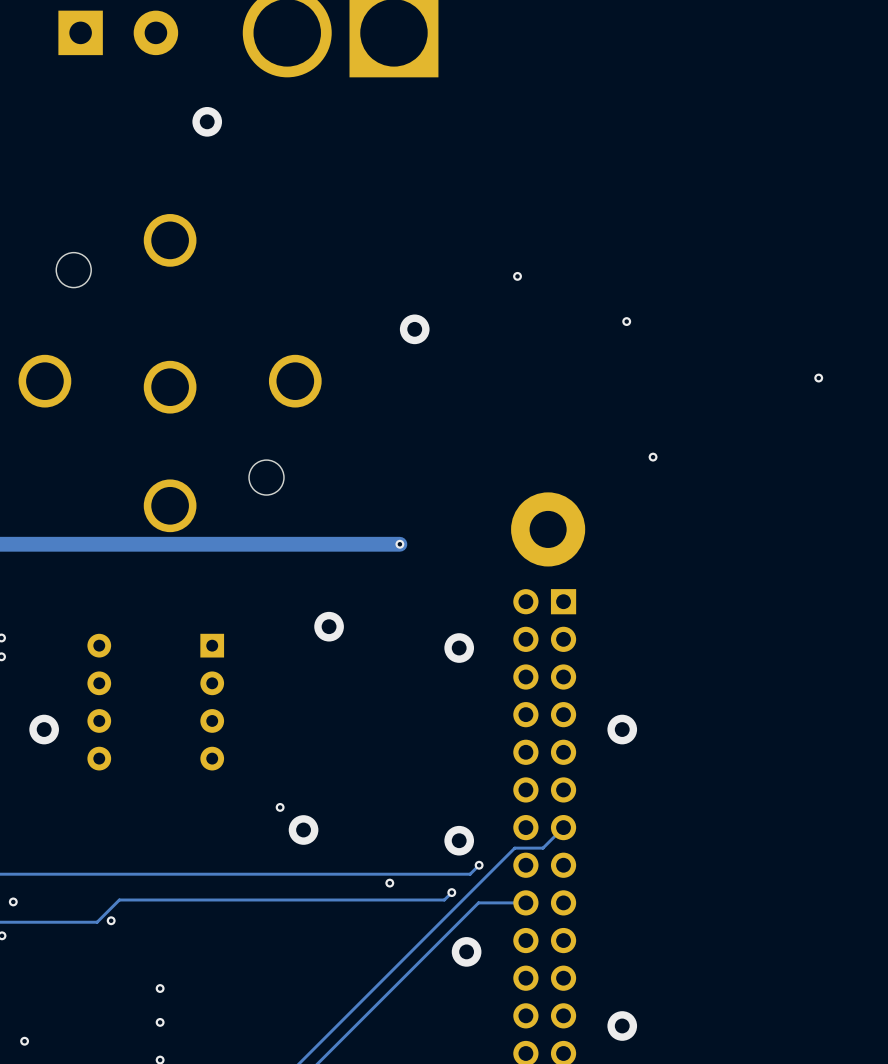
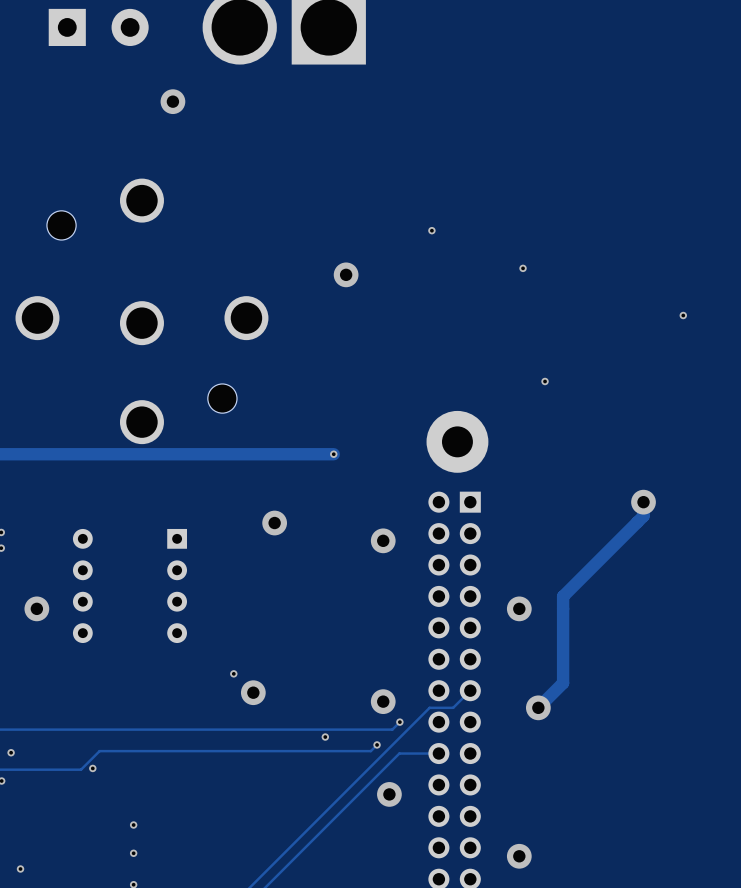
track: none -> (643, 502) (643, 516) (563, 596) (563, 683) (538, 707)
via: none -> (643, 502)
via: none -> (538, 707)

